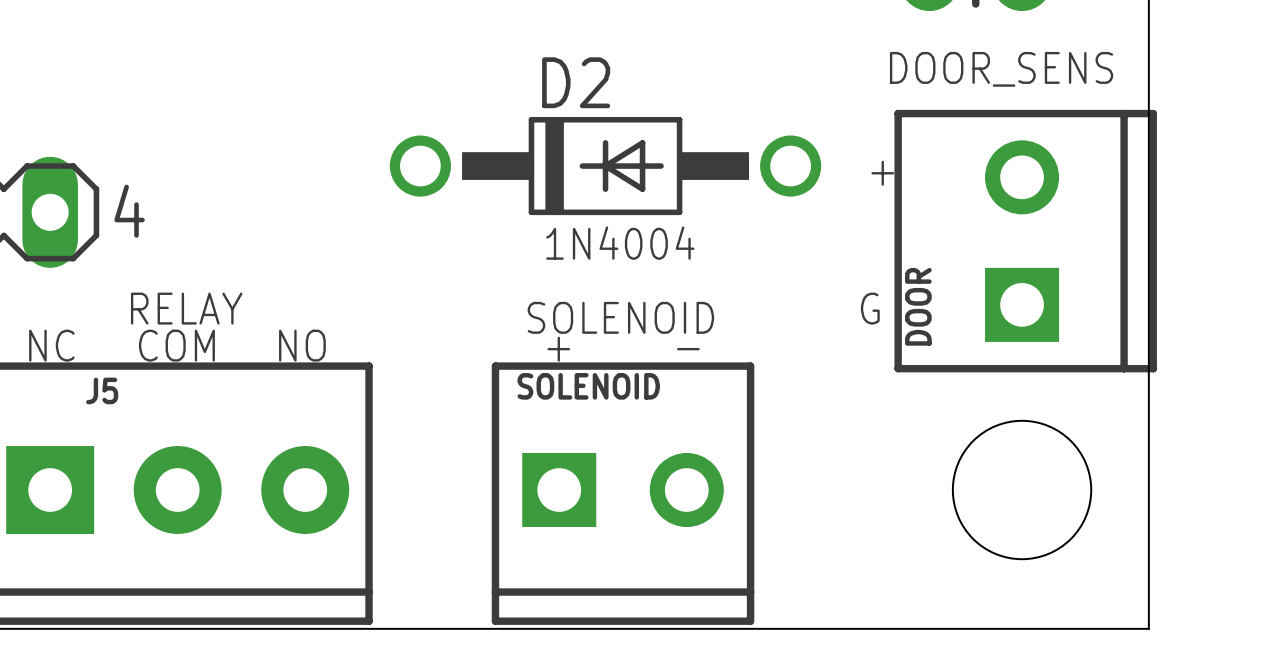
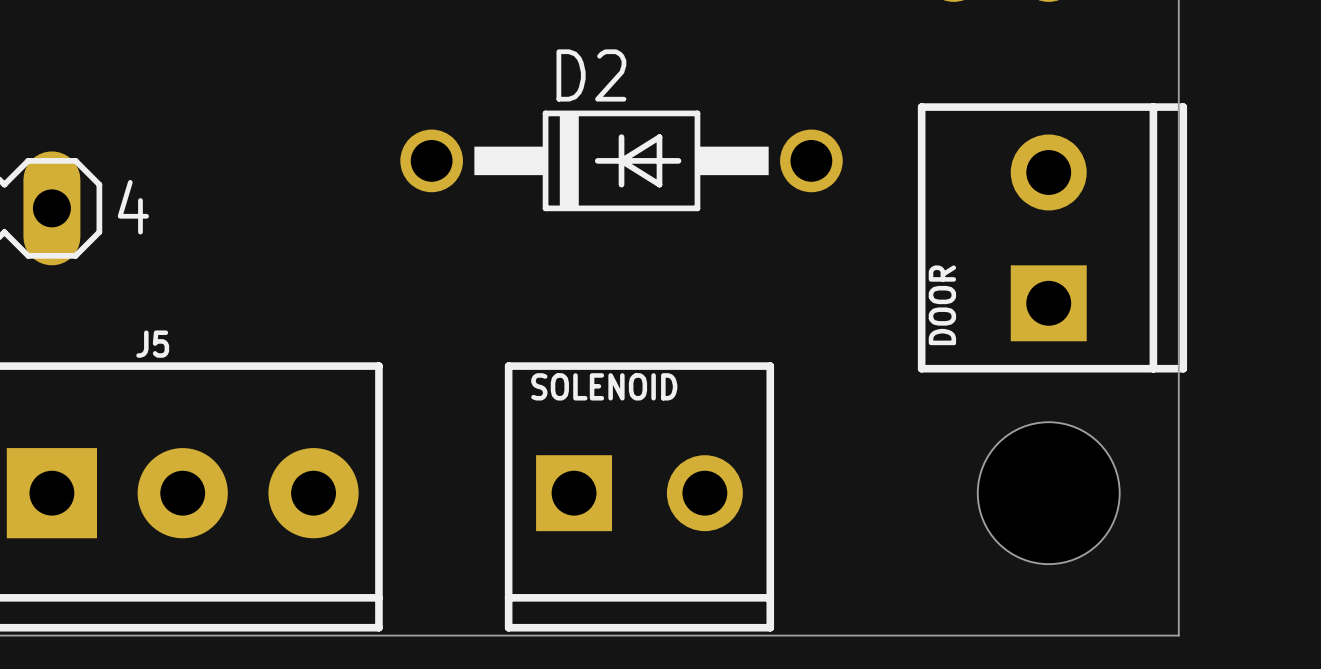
text: DOOR_SENS (1001, 69) -> none
text: + (882, 173) -> none
text: 1N4004 (620, 243) -> none
text: RELAY (186, 308) -> none
text: G (870, 308) -> none
text: SOLENOID (620, 317) -> none
text: NC (51, 345) -> none
text: COM (176, 345) -> none
text: NO (302, 345) -> none
text: + (558, 349) -> none
text: - (688, 349) -> none
J5 name position: J5 (102, 390) -> J5 (152, 344)

